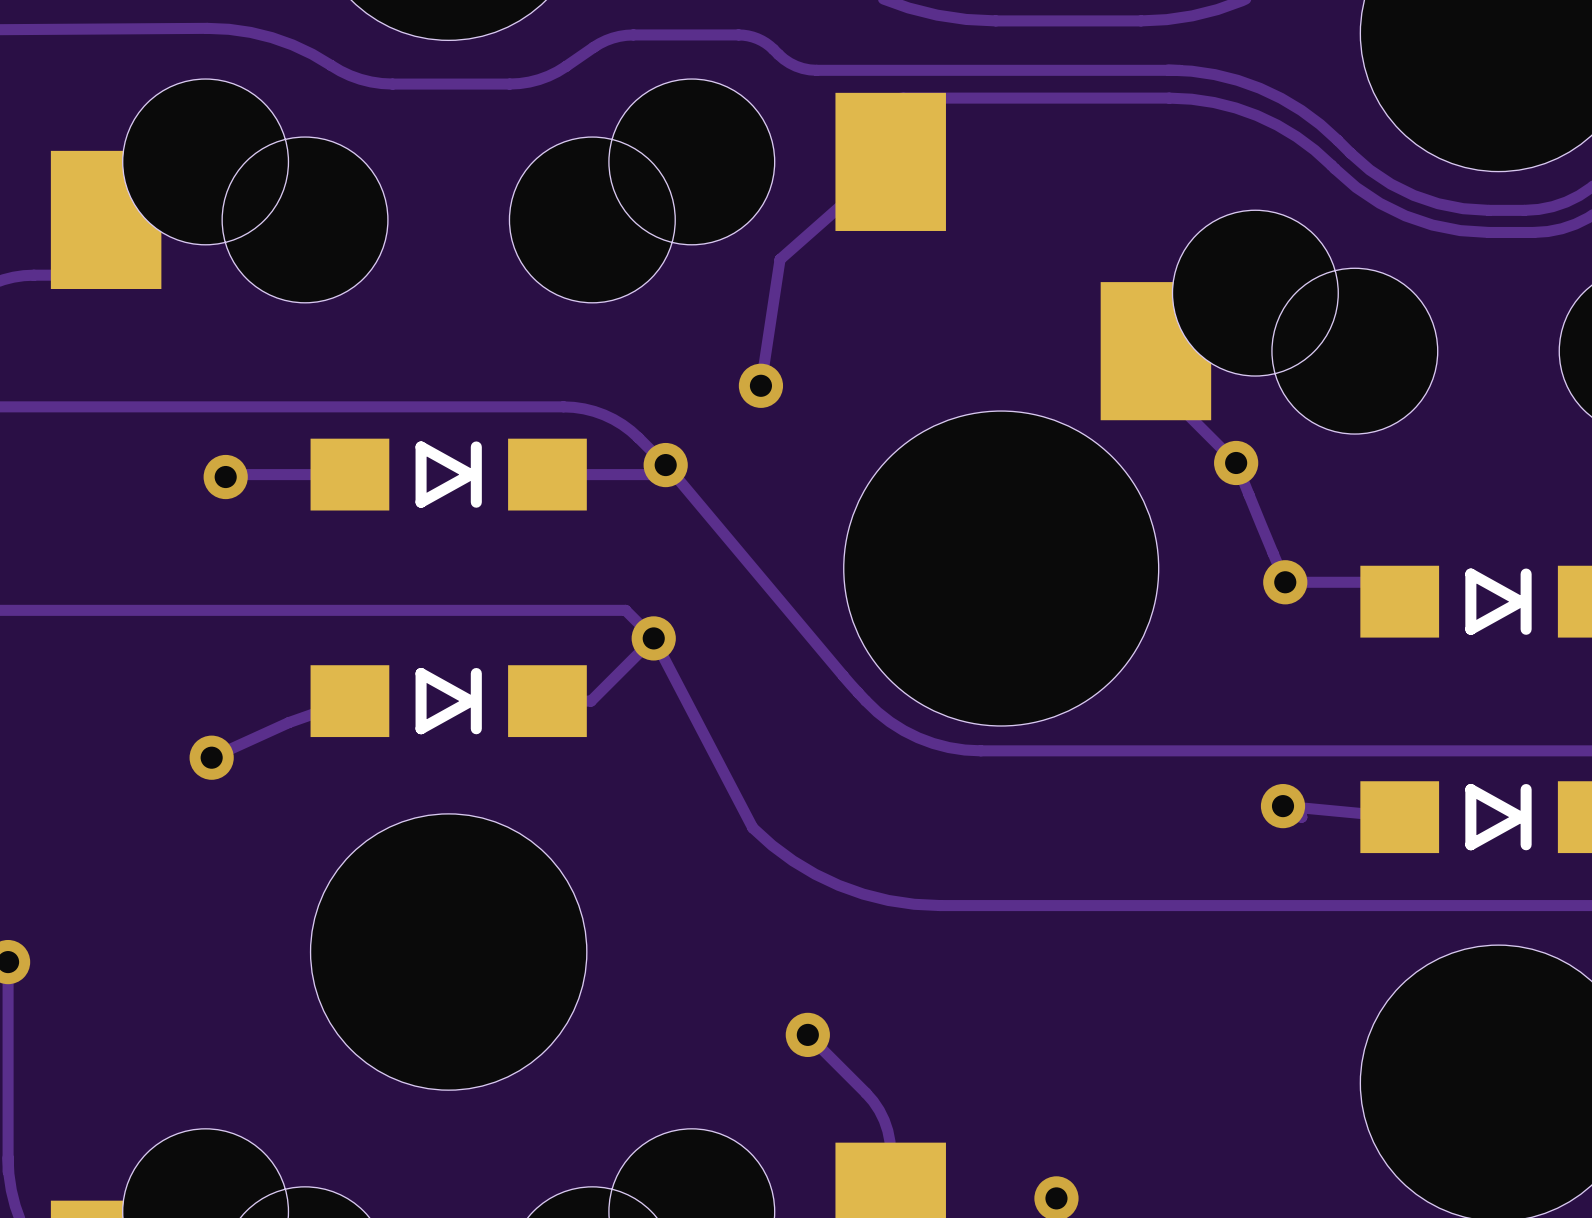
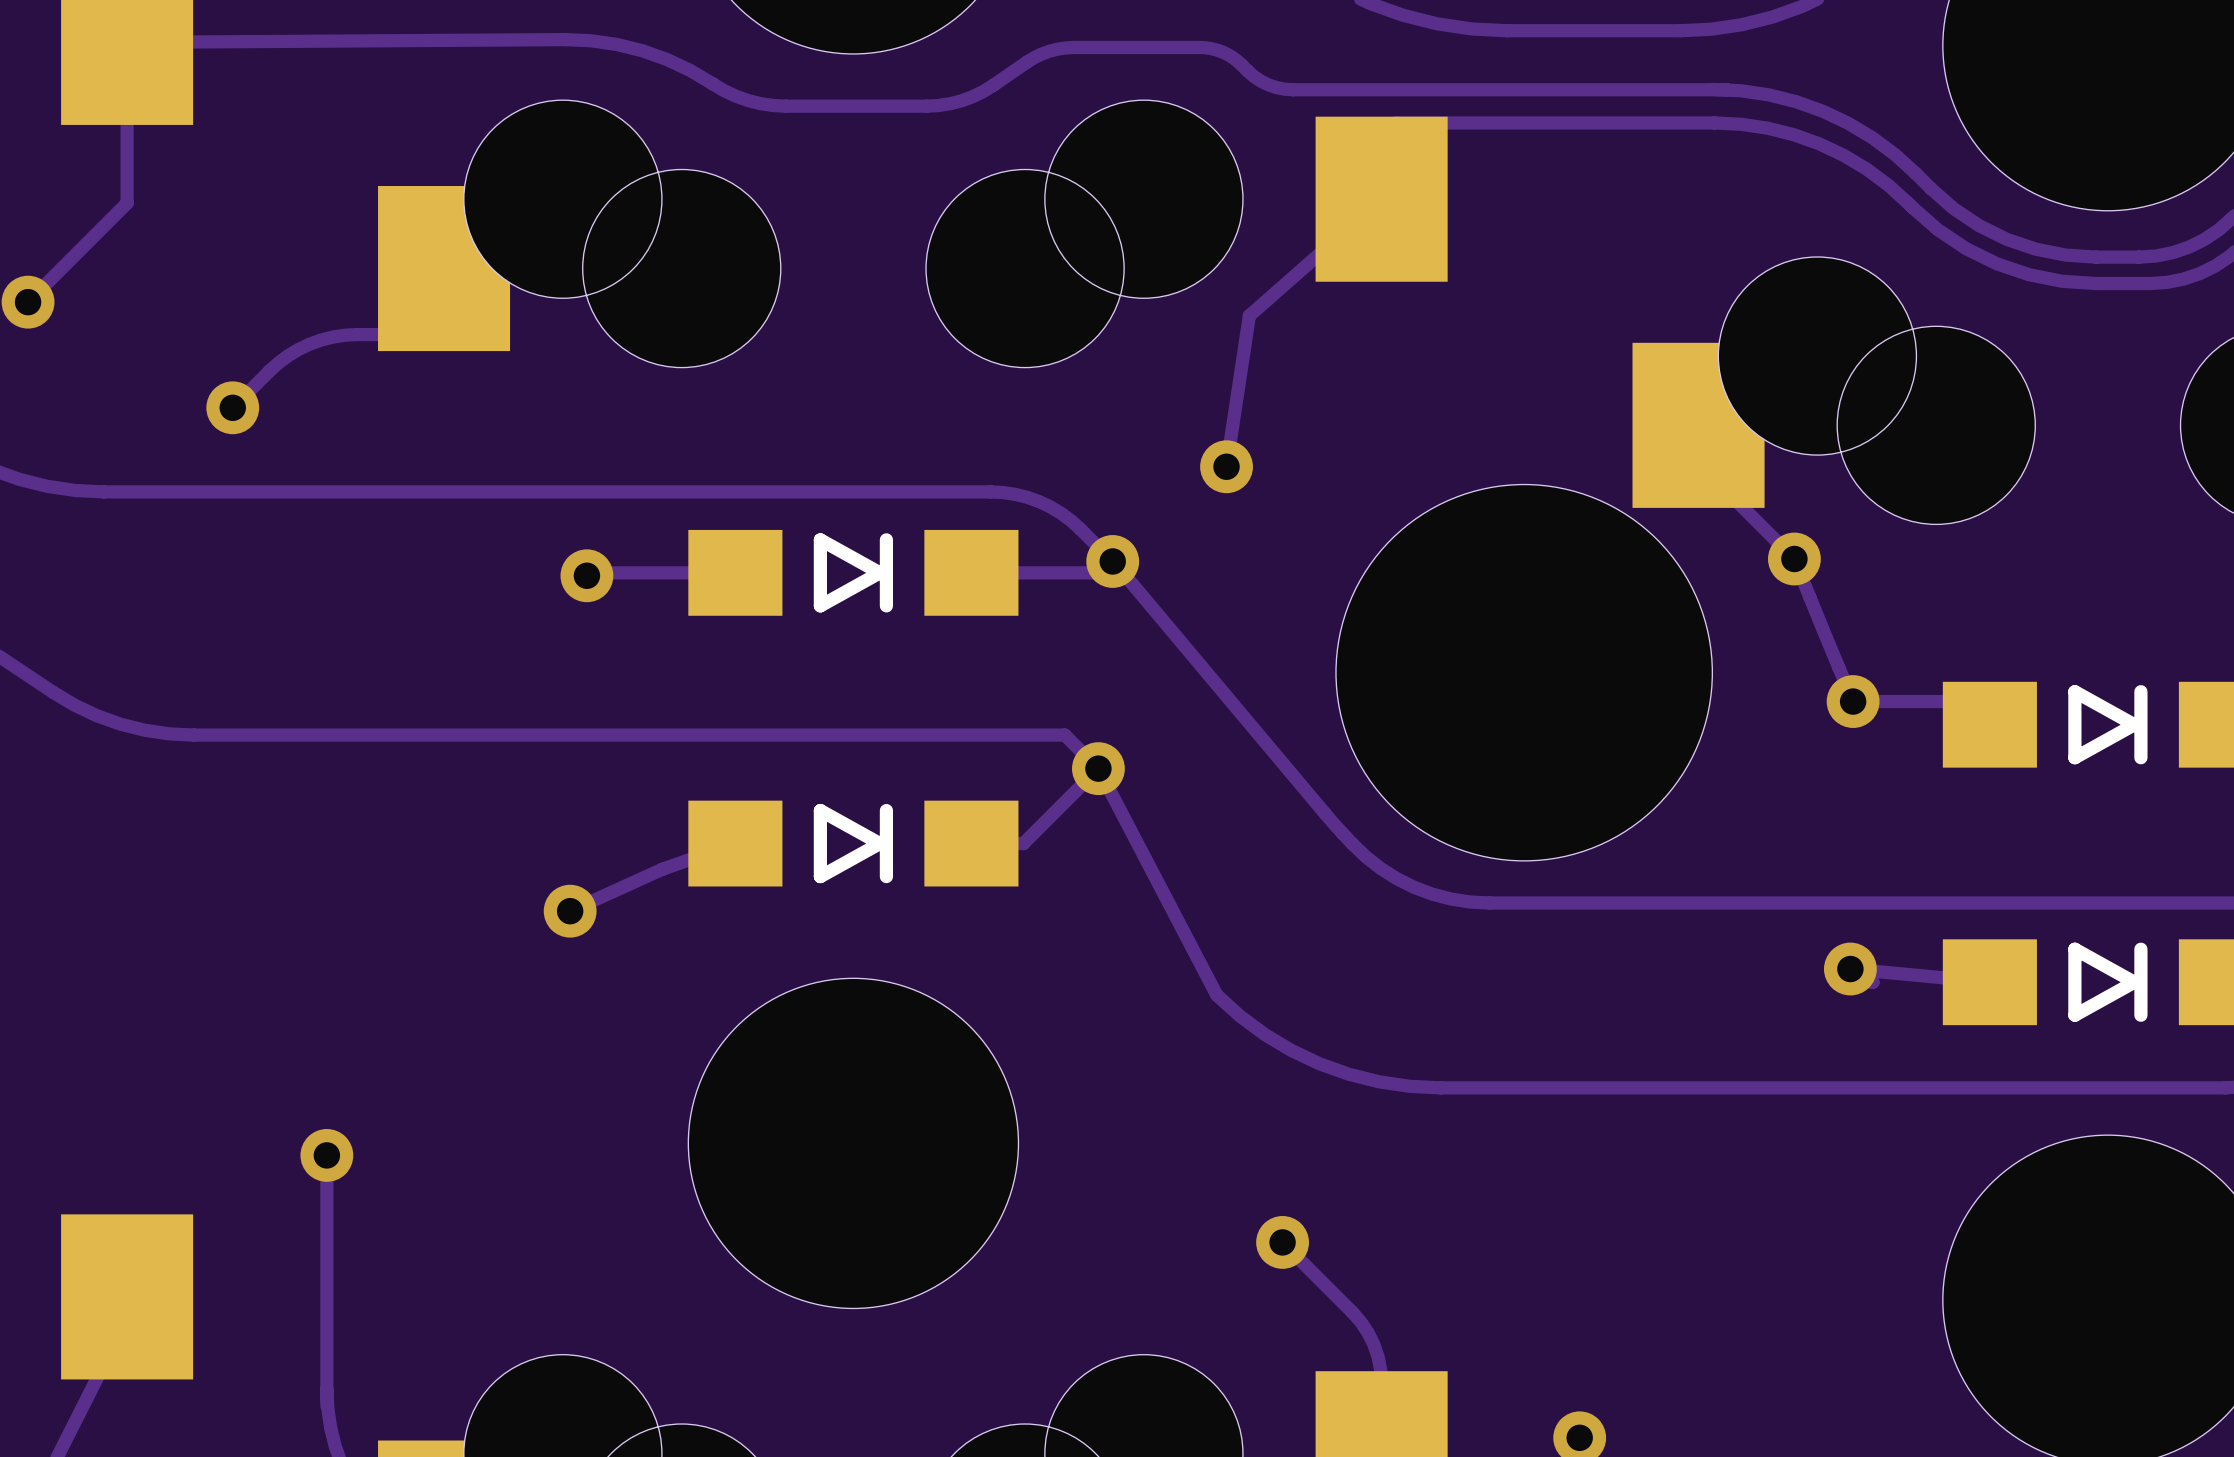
part position: (1001, 568) -> (1524, 672)

